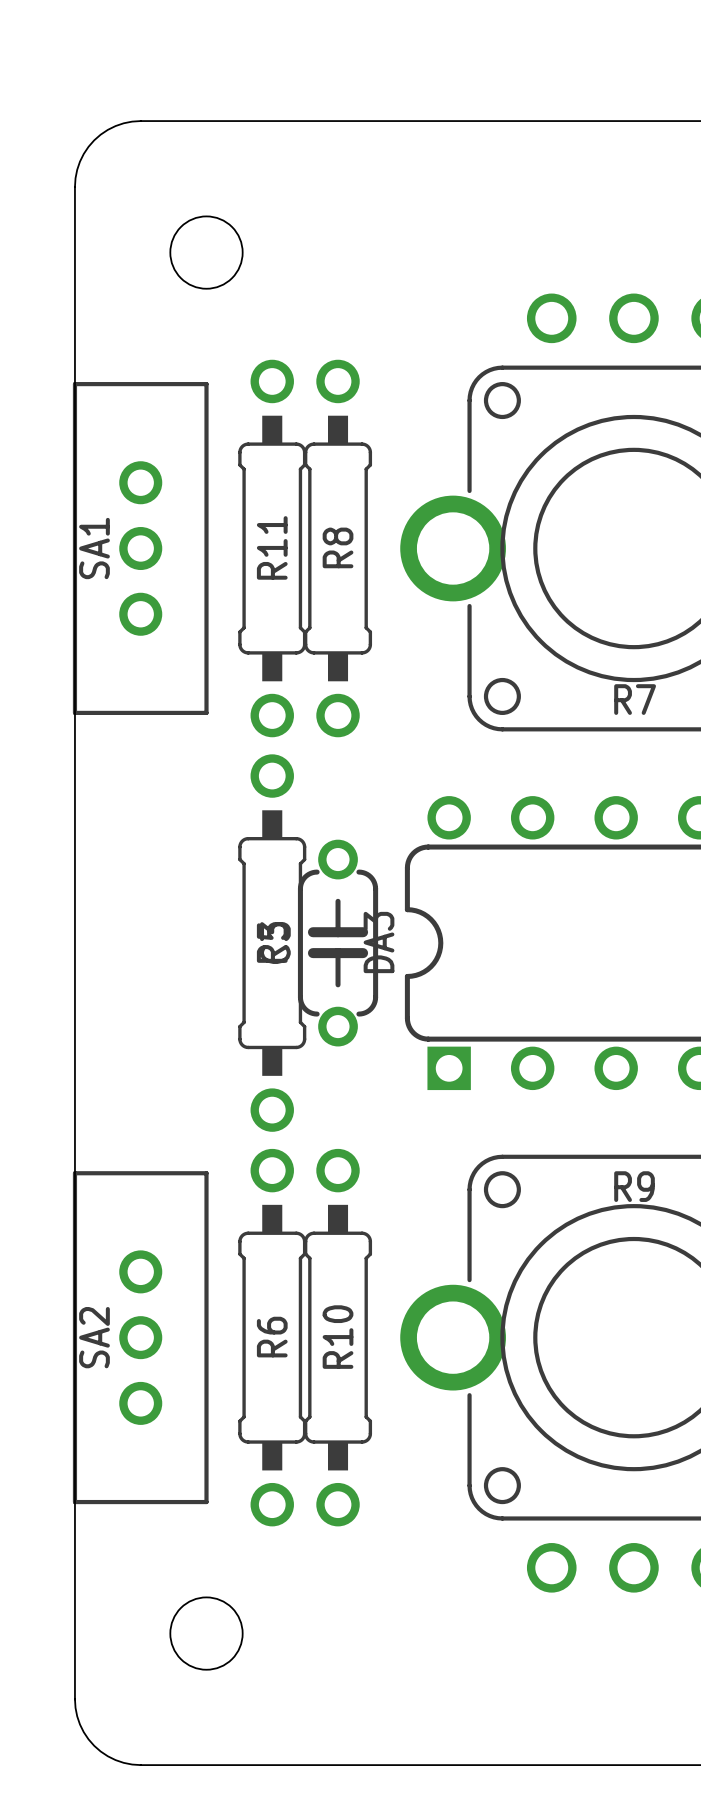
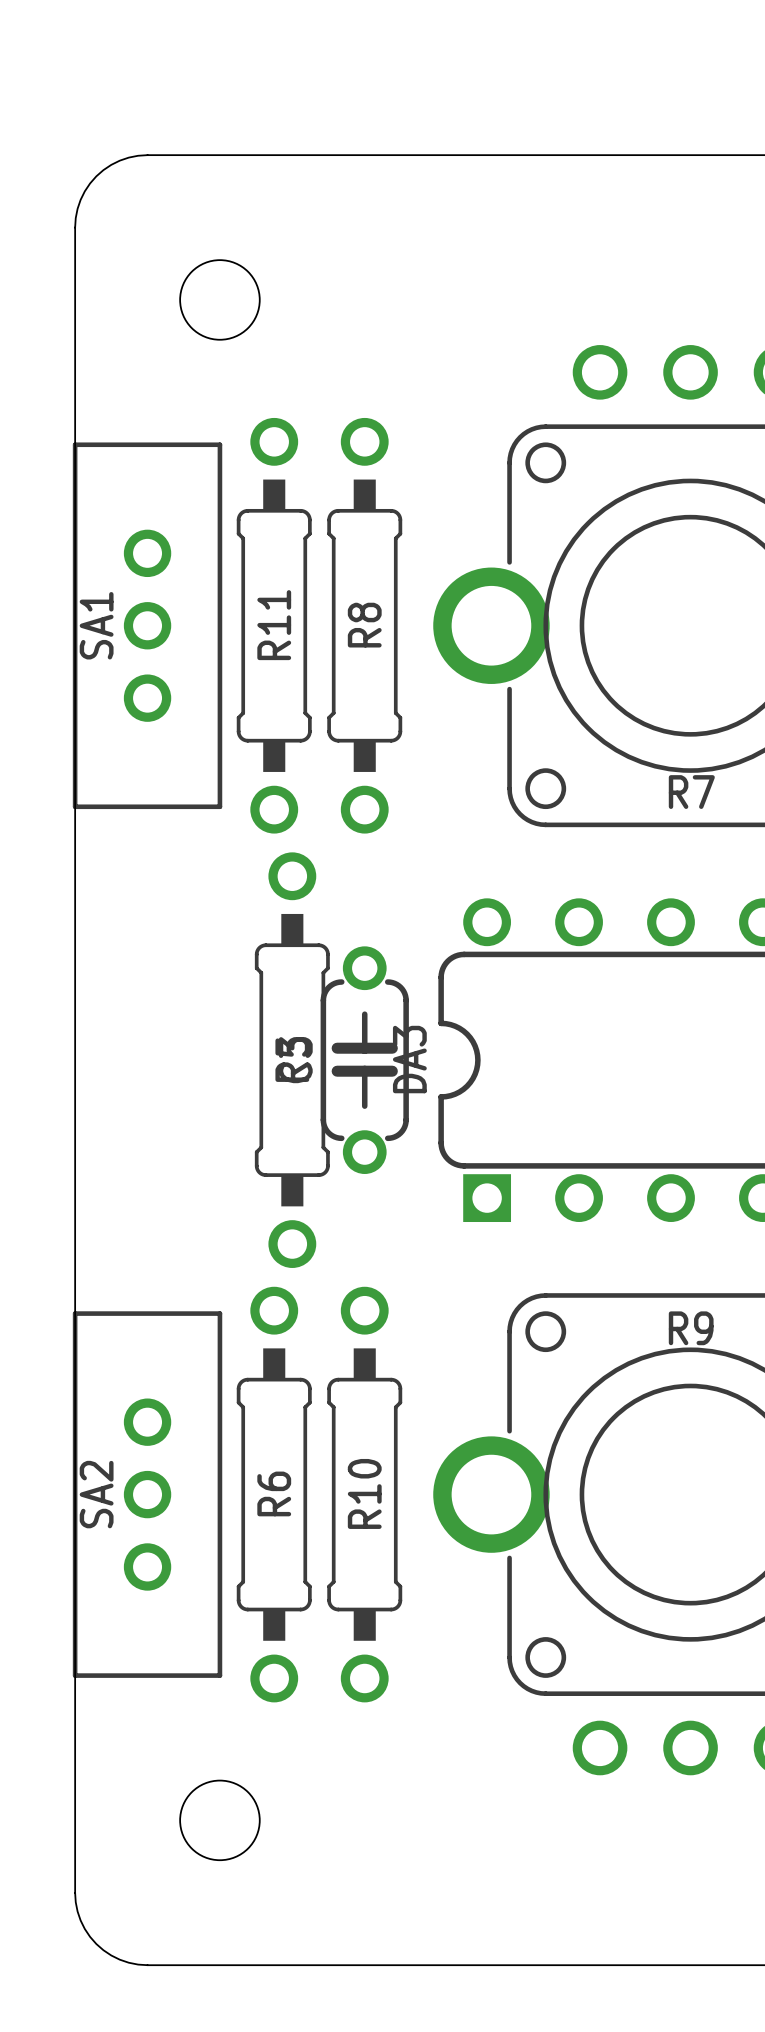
R11 position: (272, 548) -> (274, 625)
R6 position: (272, 1337) -> (274, 1494)

